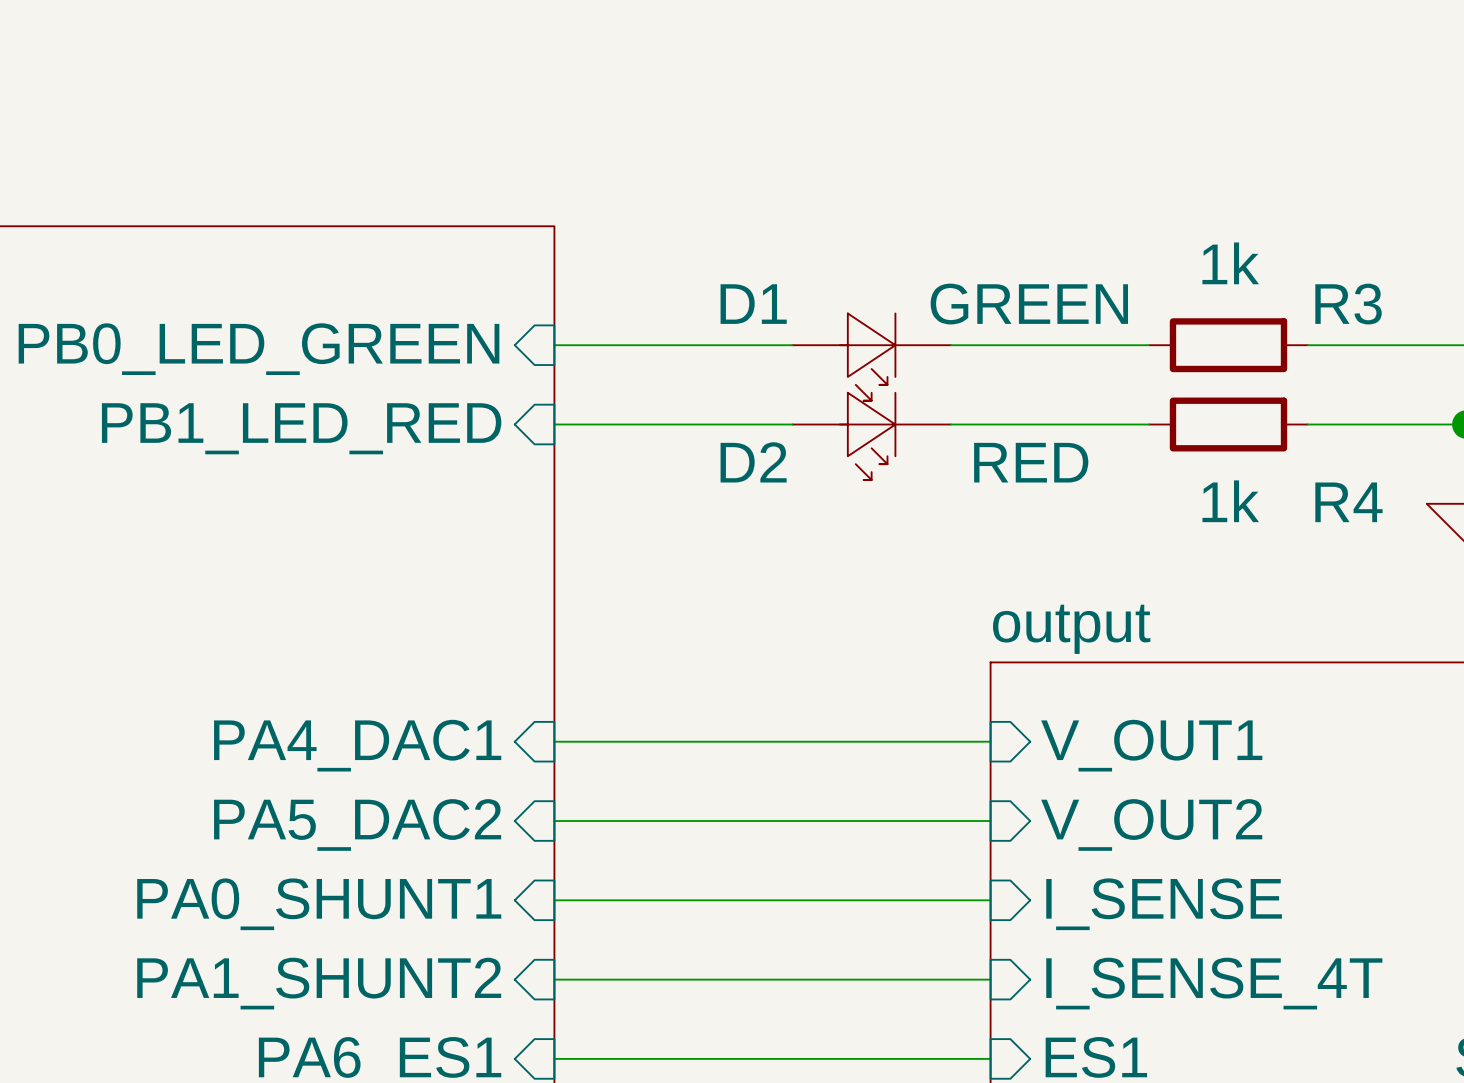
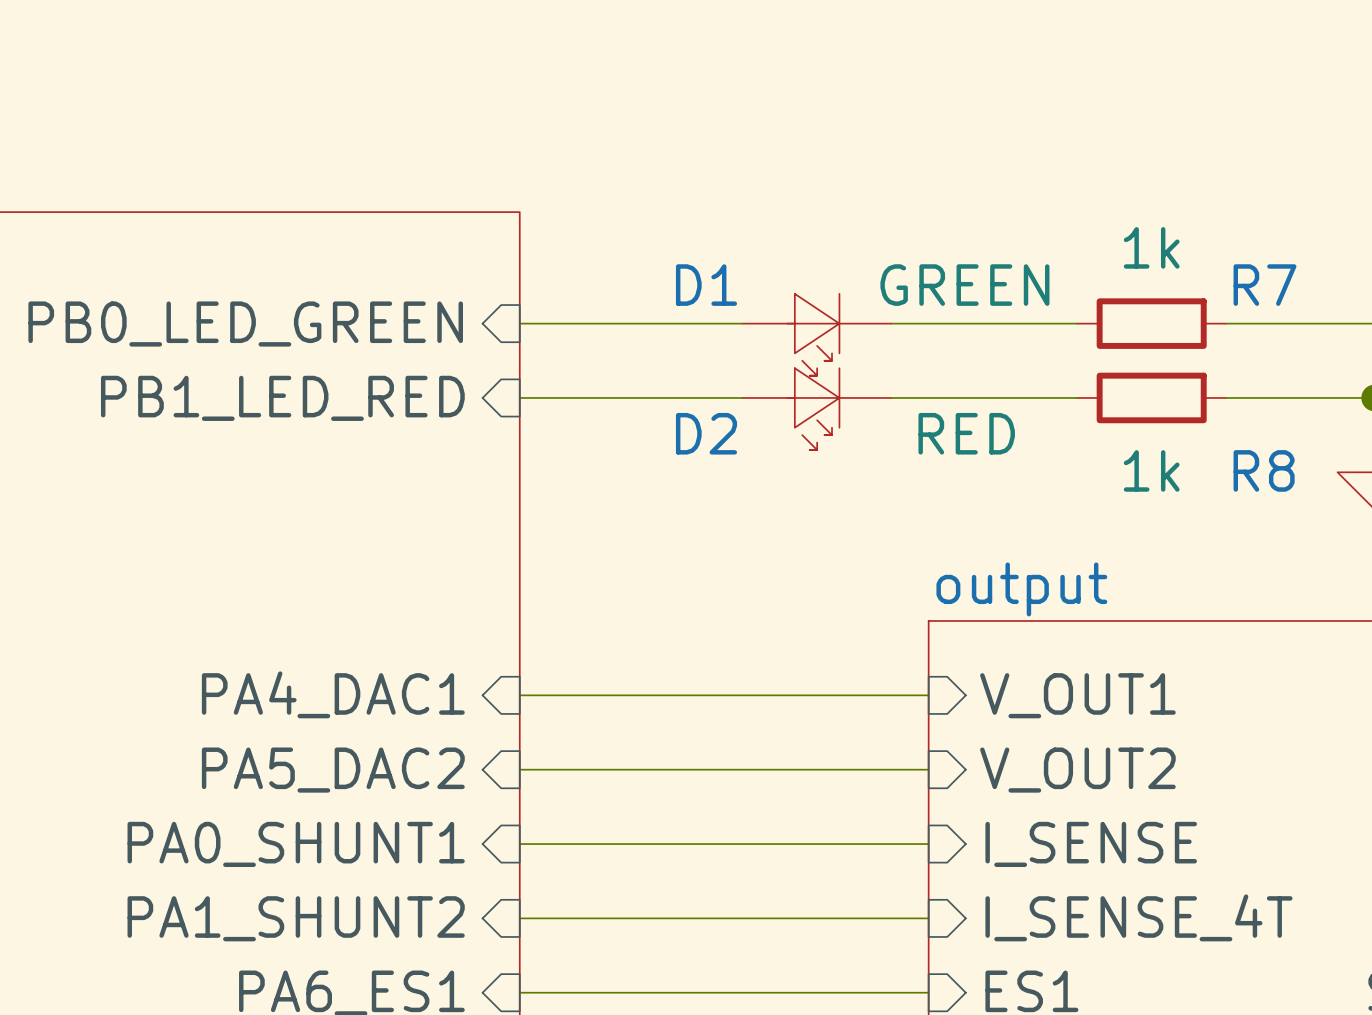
R3 name: R3 (1348, 304) -> R7 (1264, 285)
R4 name: R4 (1348, 502) -> R8 (1264, 470)

